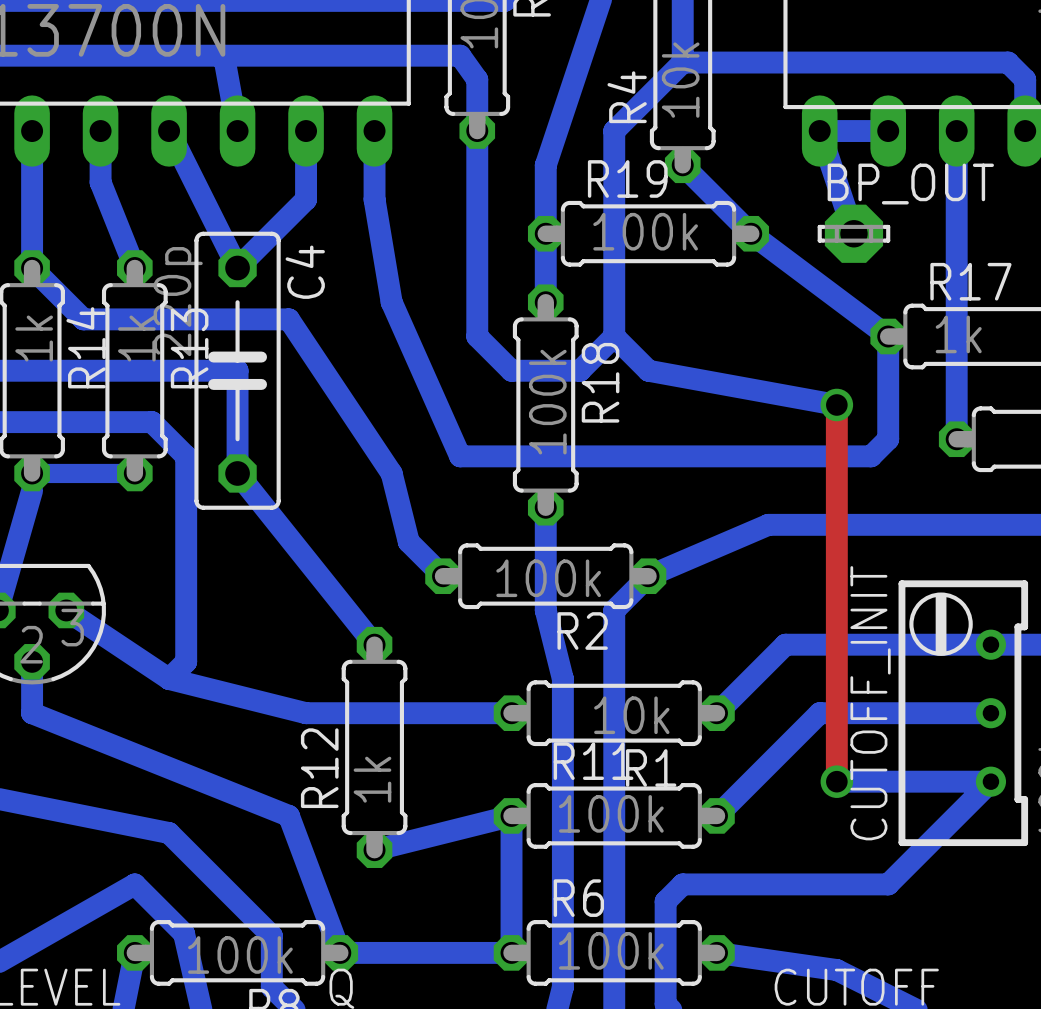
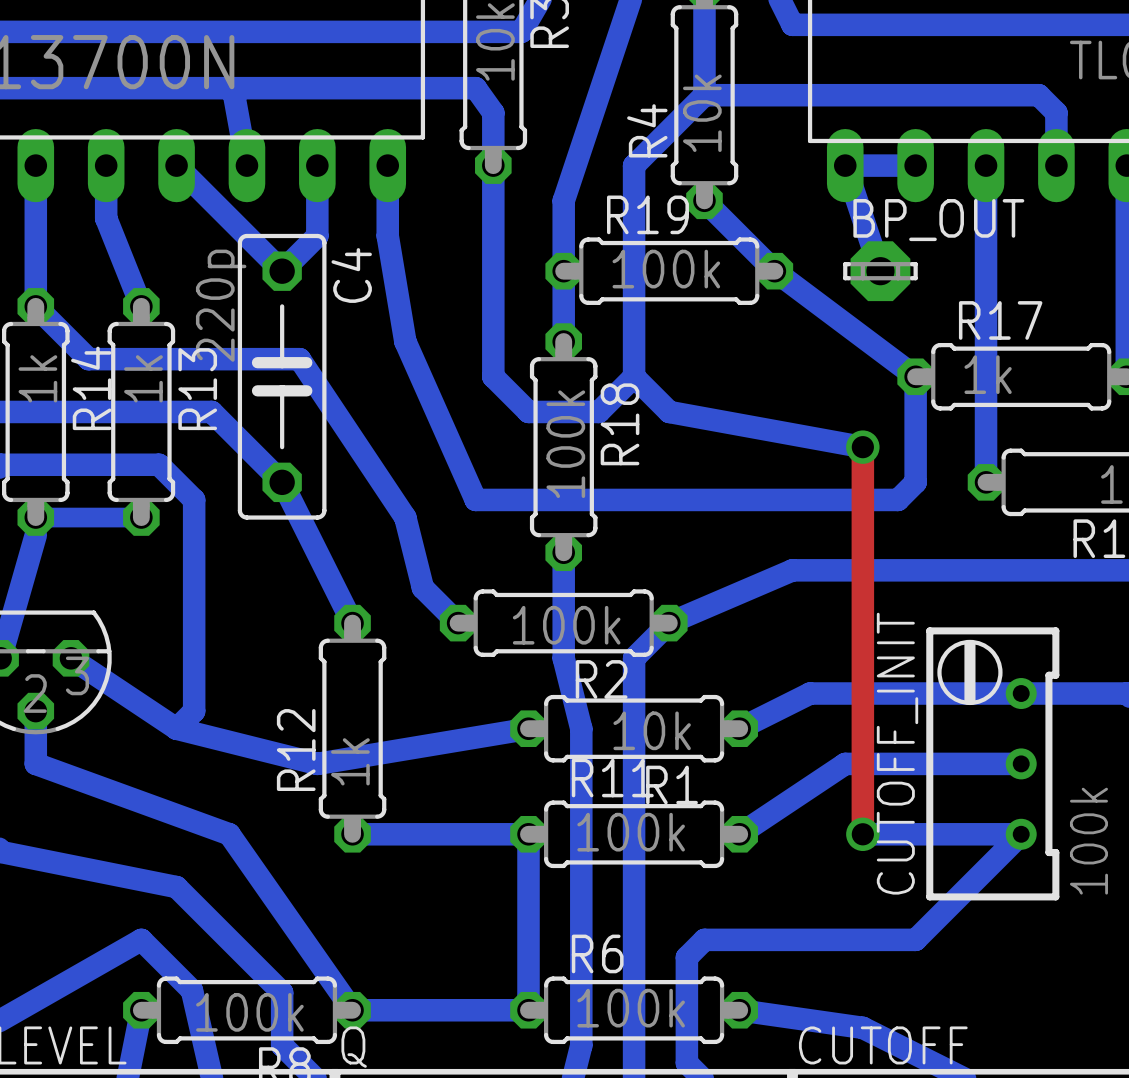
bottom track: (169, 131) (237, 268) (271, 233) -> (176, 165) (282, 271)
bottom track: (203, 370) (237, 370) (237, 473) (374, 644) -> (211, 411) (282, 482) (352, 623)
C4 position: (237, 370) -> (282, 376)
bottom track: (785, 644) (716, 713) -> (810, 693) (739, 728)
bottom track: (32, 713) (288, 815) (340, 952) -> (35, 763) (229, 834) (352, 1010)
bottom track: (306, 713) (511, 713) -> (317, 763) (528, 728)
R1 position: (614, 713) -> (634, 728)
bottom track: (819, 713) (716, 815) -> (845, 763) (739, 834)
R12 position: (374, 747) -> (352, 728)
bottom track: (511, 815) (374, 850) -> (528, 869) (528, 834) (352, 834)
R11 position: (614, 815) -> (634, 834)

